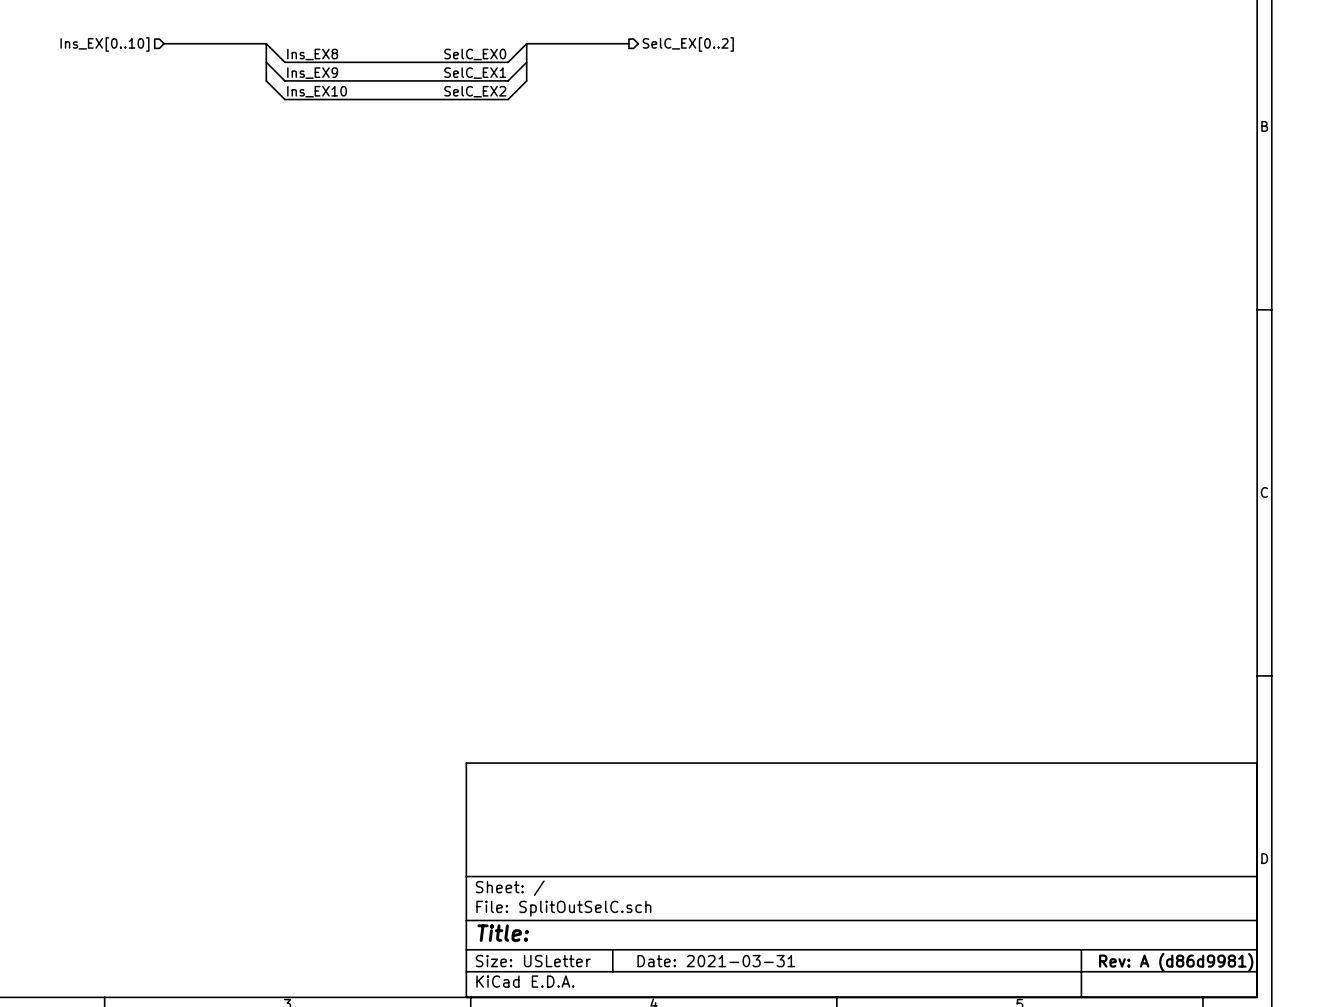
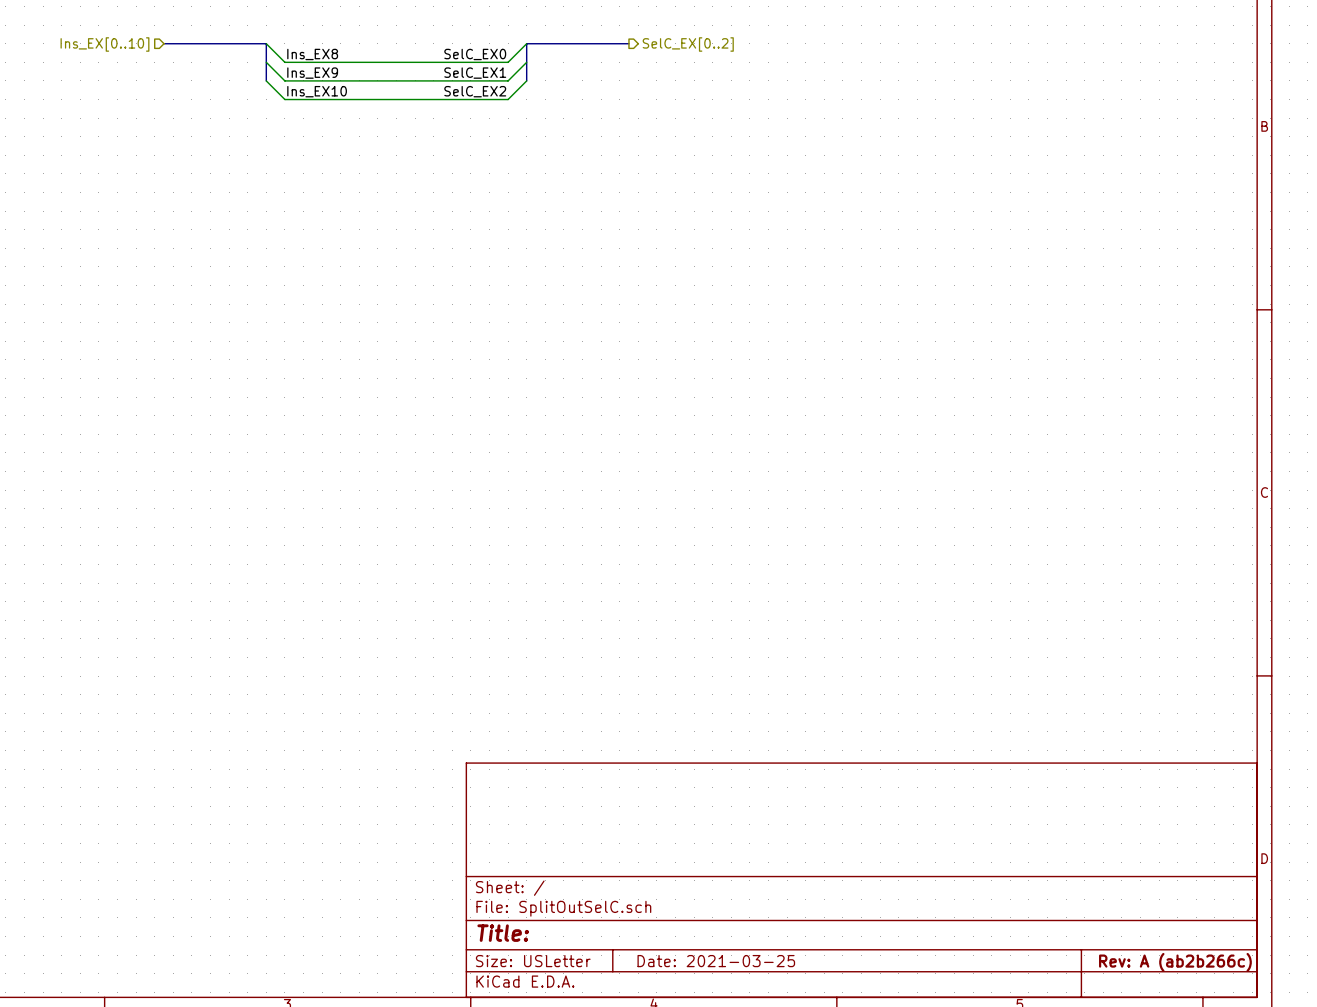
title block: Date: 2021-03-31 (716, 961) -> Date: 2021-03-25 (716, 961)
title block: Rev: A (d86d9981) (1176, 962) -> Rev: A (ab2b266c) (1175, 962)

